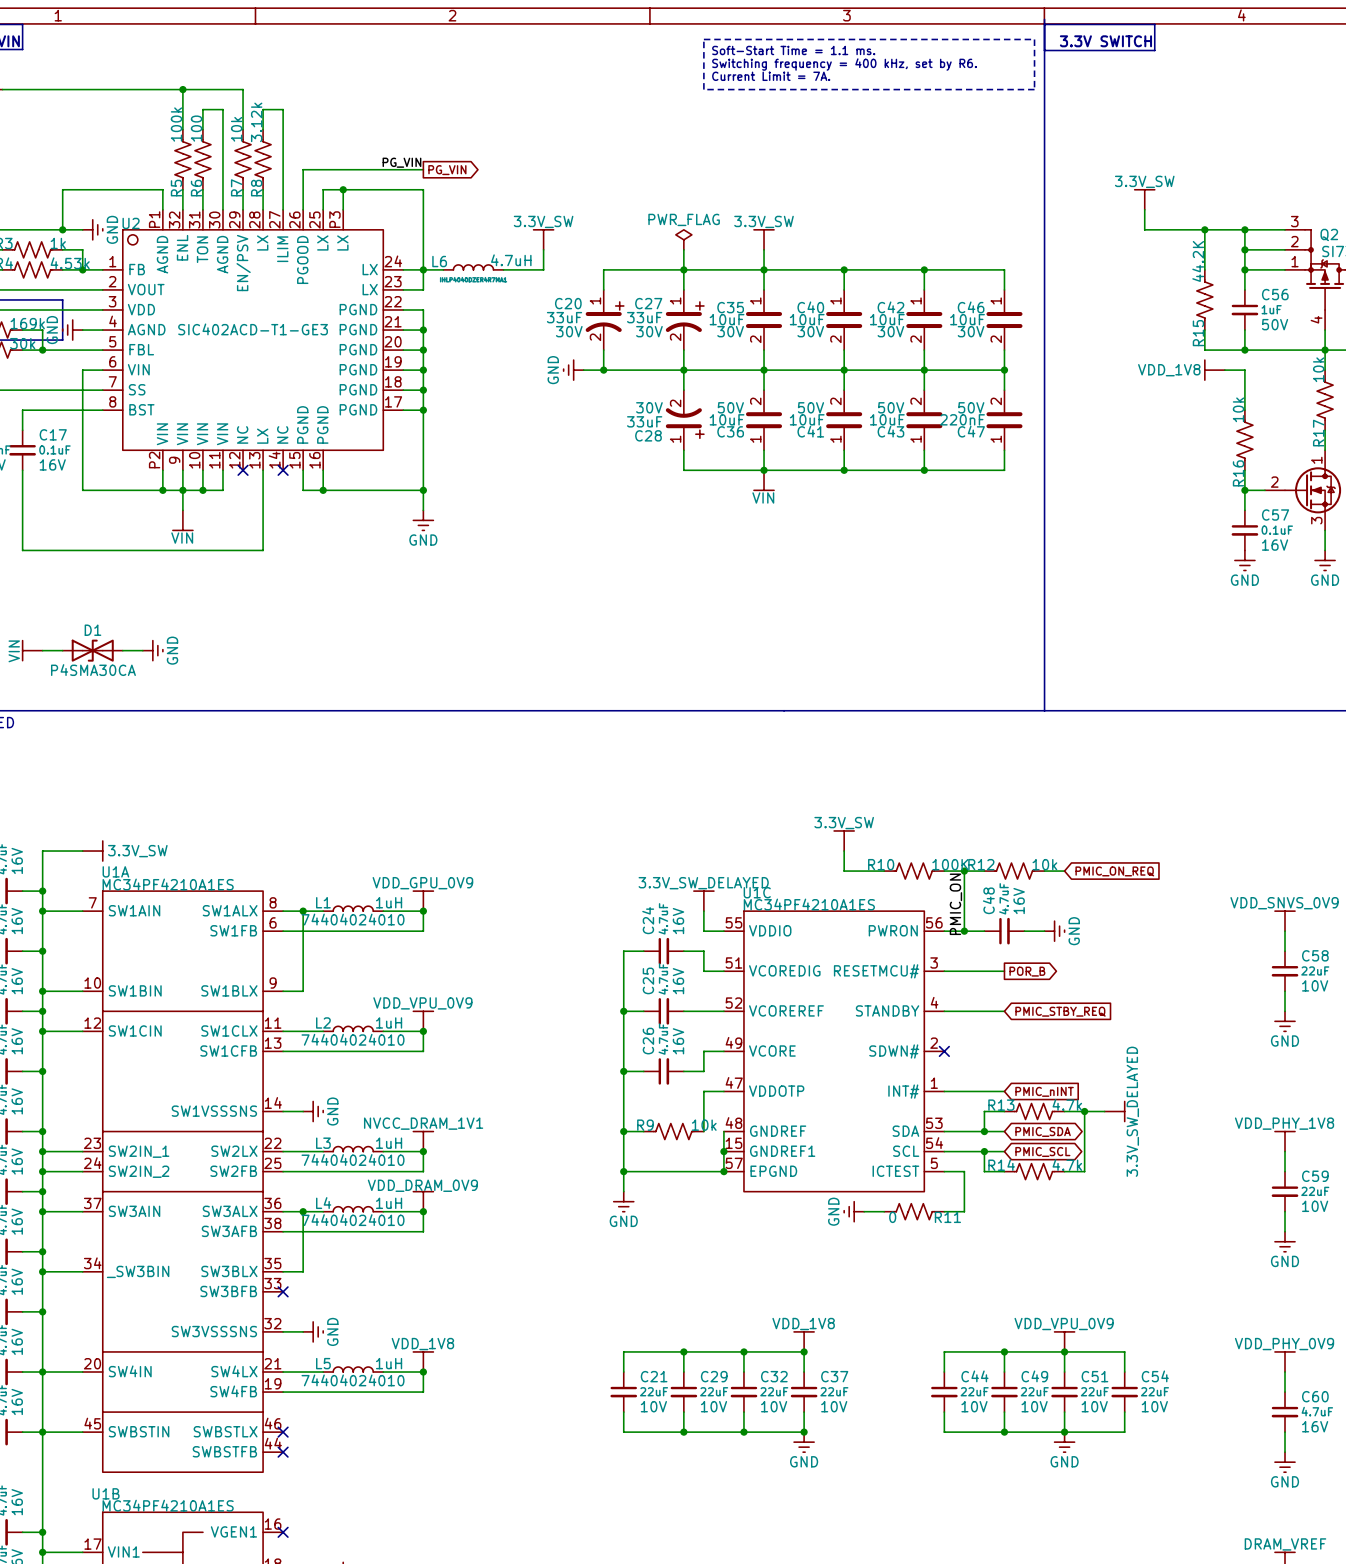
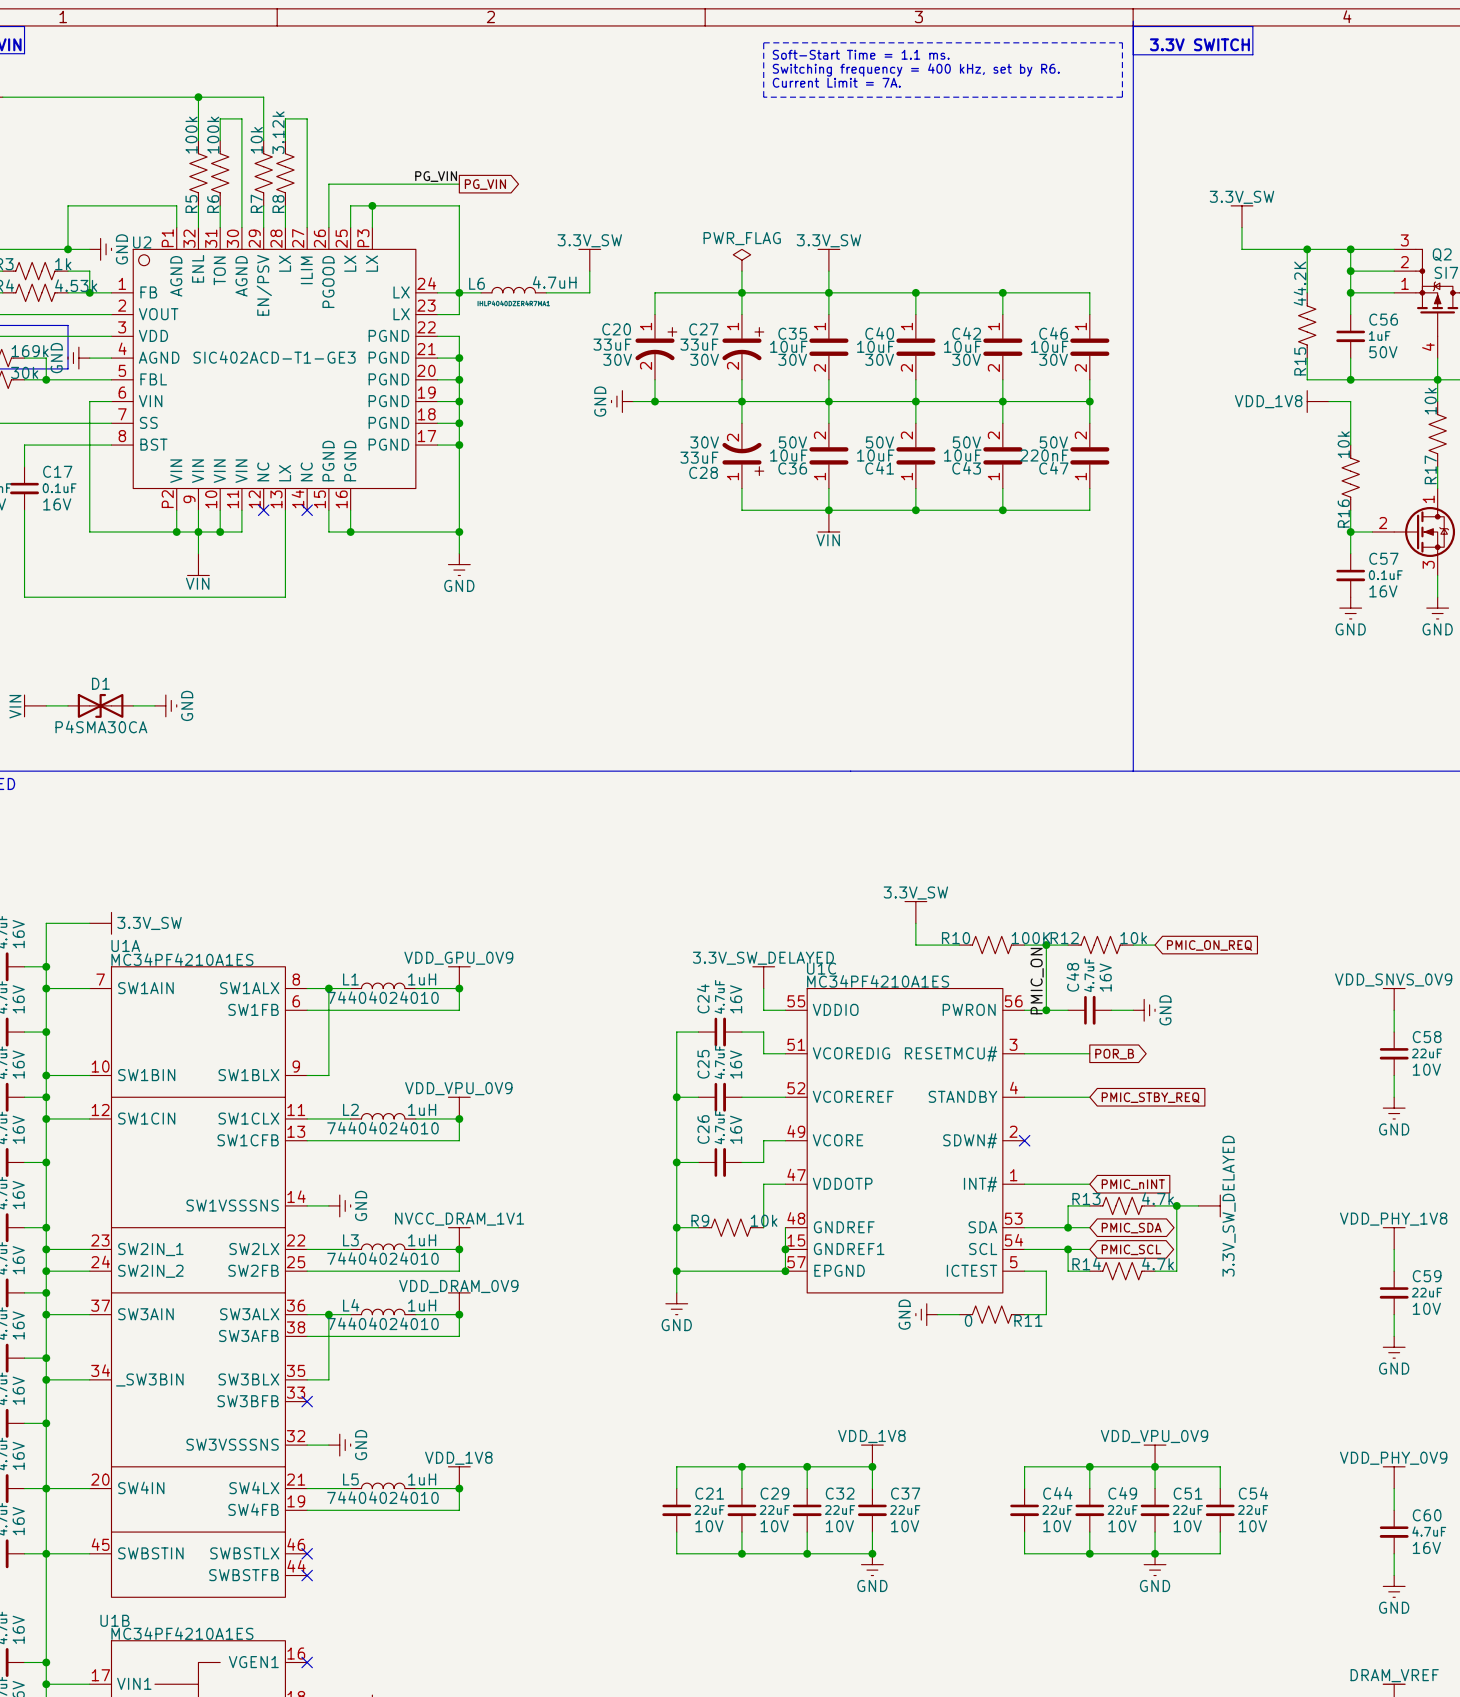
R6 value: 100 (196, 128) -> 100k (213, 135)

